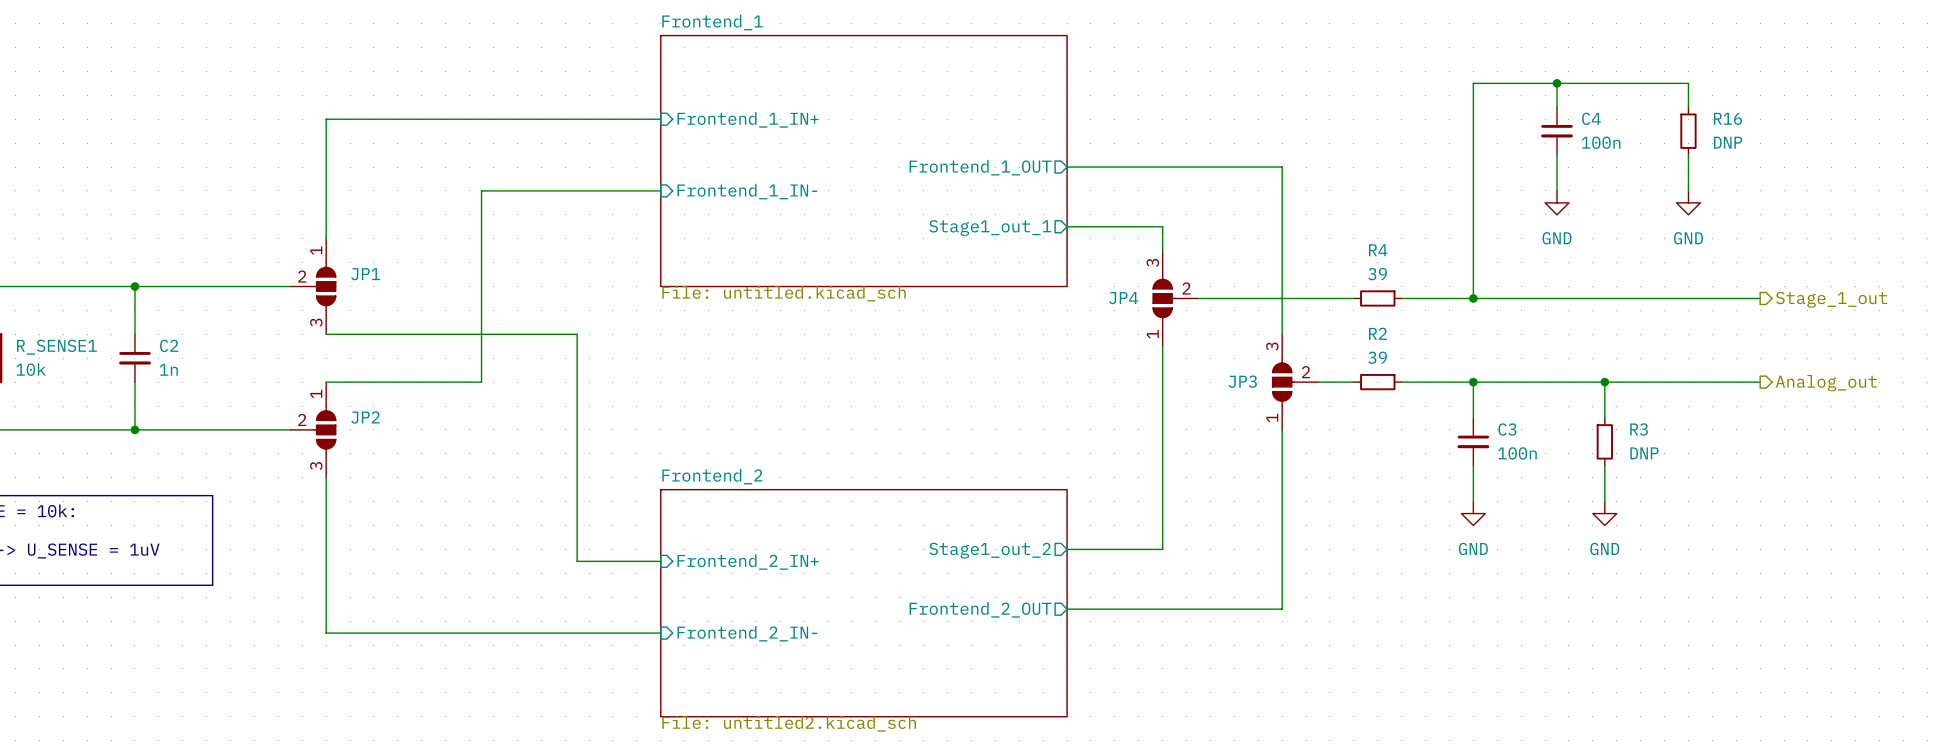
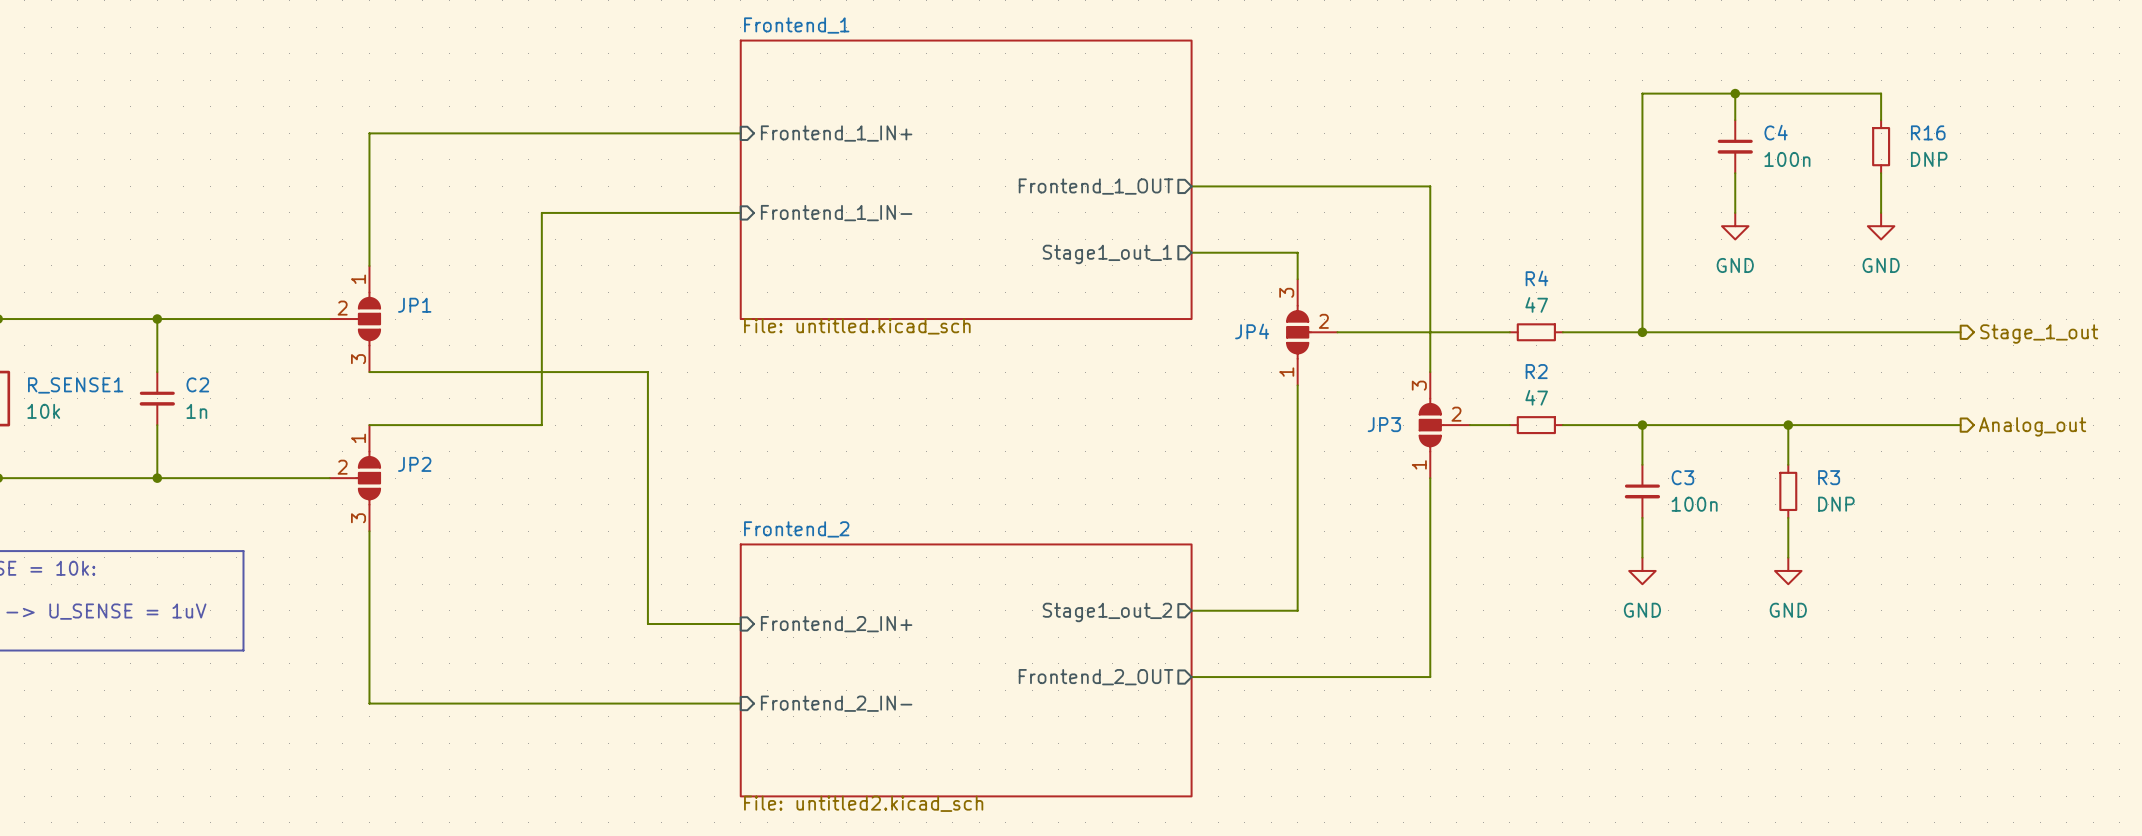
R4 value: 39 (1377, 274) -> 47 (1536, 304)
R2 value: 39 (1377, 357) -> 47 (1536, 397)

